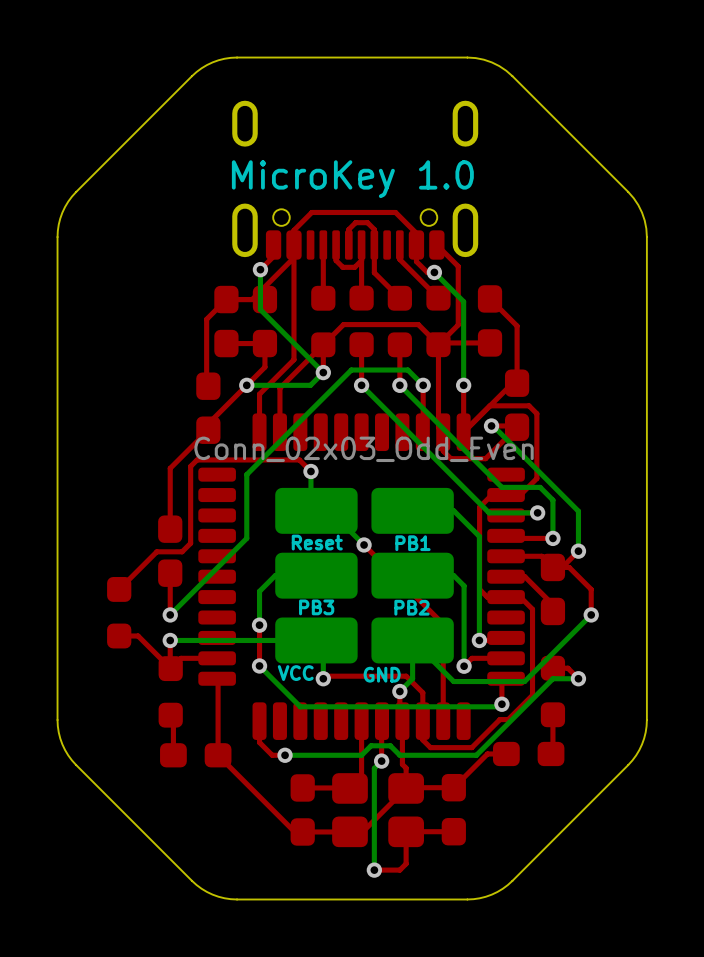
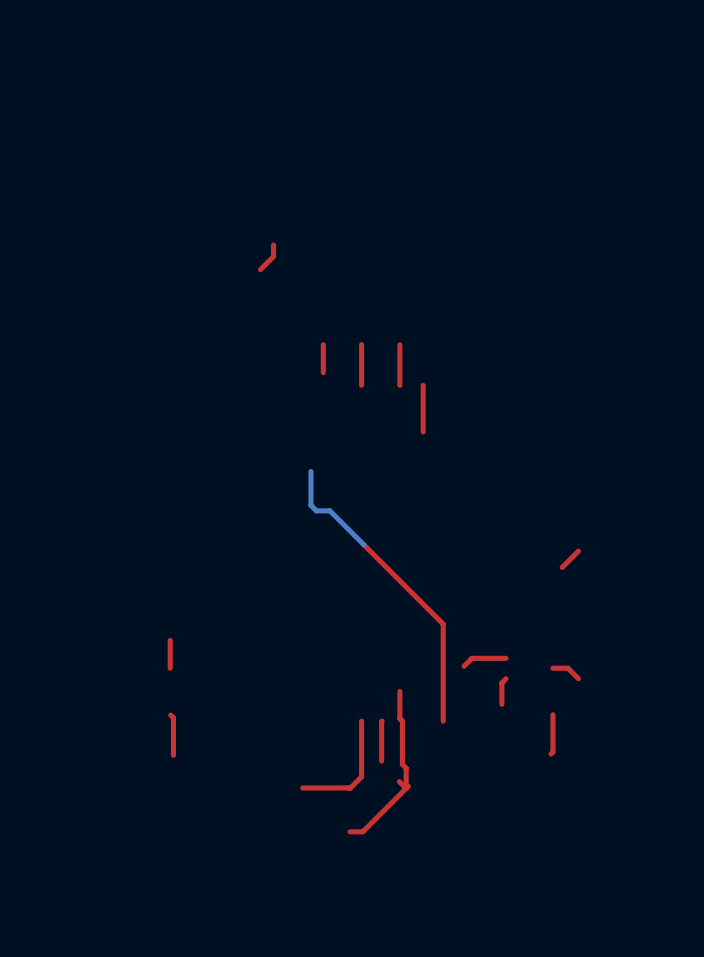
board edge: (467, 57) (237, 57) (212, 62) (191, 76) (76, 191) (65, 206) (60, 218) (57, 237) (58, 732) (65, 750) (76, 765) (191, 880) (206, 891) (218, 896) (237, 899) (467, 899) (491, 894) (512, 880) (628, 765) (636, 755) (644, 738) (646, 719) (646, 237) (644, 220) (638, 205) (628, 191) (512, 76) (491, 62) (467, 57) -> none
text: MicroKey 1.0 (352, 179) -> none
part: (355, 180) -> none
top track: (323, 245) (323, 298) -> none
top track: (336, 245) (336, 260) (342, 267) (354, 267) (361, 260) -> none
top track: (348, 245) (348, 229) (355, 222) (367, 222) (374, 229) (374, 272) (399, 298) -> none
top track: (399, 245) (399, 259) (438, 298) -> none
top track: (436, 245) (458, 266) (458, 324) (438, 344) -> none
top track: (293, 257) (252, 299) -> none
bottom track: (260, 269) (260, 309) (323, 372) (310, 385) (246, 385) -> none
via: (260, 269) -> none
top track: (434, 272) (427, 272) (416, 261) (416, 233) (395, 212) (311, 212) (293, 230) (293, 359) (259, 394) (259, 432) -> none
bottom track: (434, 272) (463, 301) (463, 385) -> none
via: (434, 272) -> none
top track: (490, 298) (517, 326) (517, 383) (512, 383) (463, 432) (463, 385) -> none
top track: (264, 299) (226, 299) (206, 319) (206, 384) (208, 386) -> none
part: (490, 320) -> none
part: (226, 321) -> none
part: (264, 321) -> none
part: (323, 321) -> none
part: (361, 321) -> none
part: (399, 321) -> none
part: (438, 321) -> none
top track: (490, 342) (440, 342) -> none
top track: (226, 343) (264, 343) (264, 367) (208, 423) (208, 430) (170, 468) (170, 529) -> none
top track: (438, 344) (418, 324) (343, 324) (279, 388) (279, 432) -> none
top track: (438, 344) (438, 427) (443, 432) (443, 451) (450, 458) (485, 458) (517, 427) (491, 425) -> none
via: (323, 372) -> none
via: (246, 385) -> none
bottom track: (361, 385) (489, 512) (537, 512) -> none
via: (361, 385) -> none
bottom track: (399, 385) (501, 487) (540, 487) (552, 500) (552, 538) -> none
via: (399, 385) -> none
bottom track: (423, 385) (407, 370) (351, 370) (246, 474) (246, 538) (170, 614) -> none
via: (423, 385) -> none
via: (463, 385) -> none
top track: (490, 405) (529, 405) (536, 413) (536, 478) (520, 495) (491, 495) (479, 507) (479, 589) (487, 597) (520, 597) (532, 609) (532, 695) (508, 719) (499, 719) (471, 747) (430, 747) (422, 739) (422, 692) (406, 676) (325, 676) (323, 678) -> none
part: (517, 405) -> none
part: (208, 408) -> none
bottom track: (491, 425) (578, 511) (578, 551) -> none
via: (491, 425) -> none
top track: (310, 471) (299, 459) (197, 459) (190, 466) (190, 543) (182, 551) (156, 551) (119, 589) -> none
via: (310, 471) -> none
bottom track: (412, 510) (453, 510) (479, 536) (479, 640) -> none
via: (537, 512) -> none
top track: (506, 535) (508, 538) (552, 538) -> none
via: (552, 538) -> none
text: Reset (317, 542) -> none
text: PB1 (412, 543) -> none
via: (364, 544) -> none
part: (170, 551) -> none
via: (578, 551) -> none
top track: (506, 556) (541, 556) (552, 567) (569, 567) (591, 589) (591, 614) -> none
top track: (170, 573) (170, 614) -> none
bottom track: (316, 575) (275, 575) (259, 591) (259, 625) -> none
part: Conn_02x03_Odd_Even (364, 575) -> none
bottom track: (412, 575) (453, 575) (464, 585) (464, 666) -> none
part: (361, 576) -> none
top track: (506, 576) (524, 576) (552, 604) (552, 611) -> none
part: (552, 589) -> none
text: PB3 (316, 607) -> none
text: PB2 (411, 607) -> none
part: (119, 612) -> none
via: (170, 614) -> none
bottom track: (591, 614) (524, 681) (453, 681) (412, 640) (412, 678) (399, 691) -> none
via: (591, 614) -> none
top track: (259, 625) (259, 665) -> none
via: (259, 625) -> none
top track: (119, 636) (138, 636) (170, 668) (180, 658) (217, 658) -> none
bottom track: (170, 640) (316, 640) (323, 647) (323, 678) -> none
via: (170, 640) -> none
via: (479, 640) -> none
bottom track: (259, 665) (300, 706) (499, 706) (501, 704) -> none
via: (259, 665) -> none
via: (464, 666) -> none
text: VCC (295, 673) -> none
text: GND (382, 674) -> none
top track: (217, 678) (218, 755) (294, 831) (349, 831) -> none
via: (323, 678) -> none
bottom track: (578, 678) (552, 678) (476, 755) (399, 755) (390, 745) (371, 745) (361, 755) (285, 755) -> none
via: (578, 678) -> none
part: (170, 691) -> none
via: (399, 691) -> none
part: (552, 691) -> none
via: (501, 704) -> none
top track: (259, 721) (259, 742) (272, 755) (285, 755) -> none
top track: (506, 753) (487, 753) (453, 787) (406, 787) -> none
part: (528, 753) -> none
part: (195, 755) -> none
via: (285, 755) -> none
bottom track: (381, 761) (374, 768) (374, 870) -> none
via: (381, 761) -> none
part: (302, 809) -> none
part: (453, 809) -> none
part: (378, 810) -> none
top track: (453, 831) (406, 831) (406, 863) (399, 870) (374, 870) -> none
via: (374, 870) -> none

